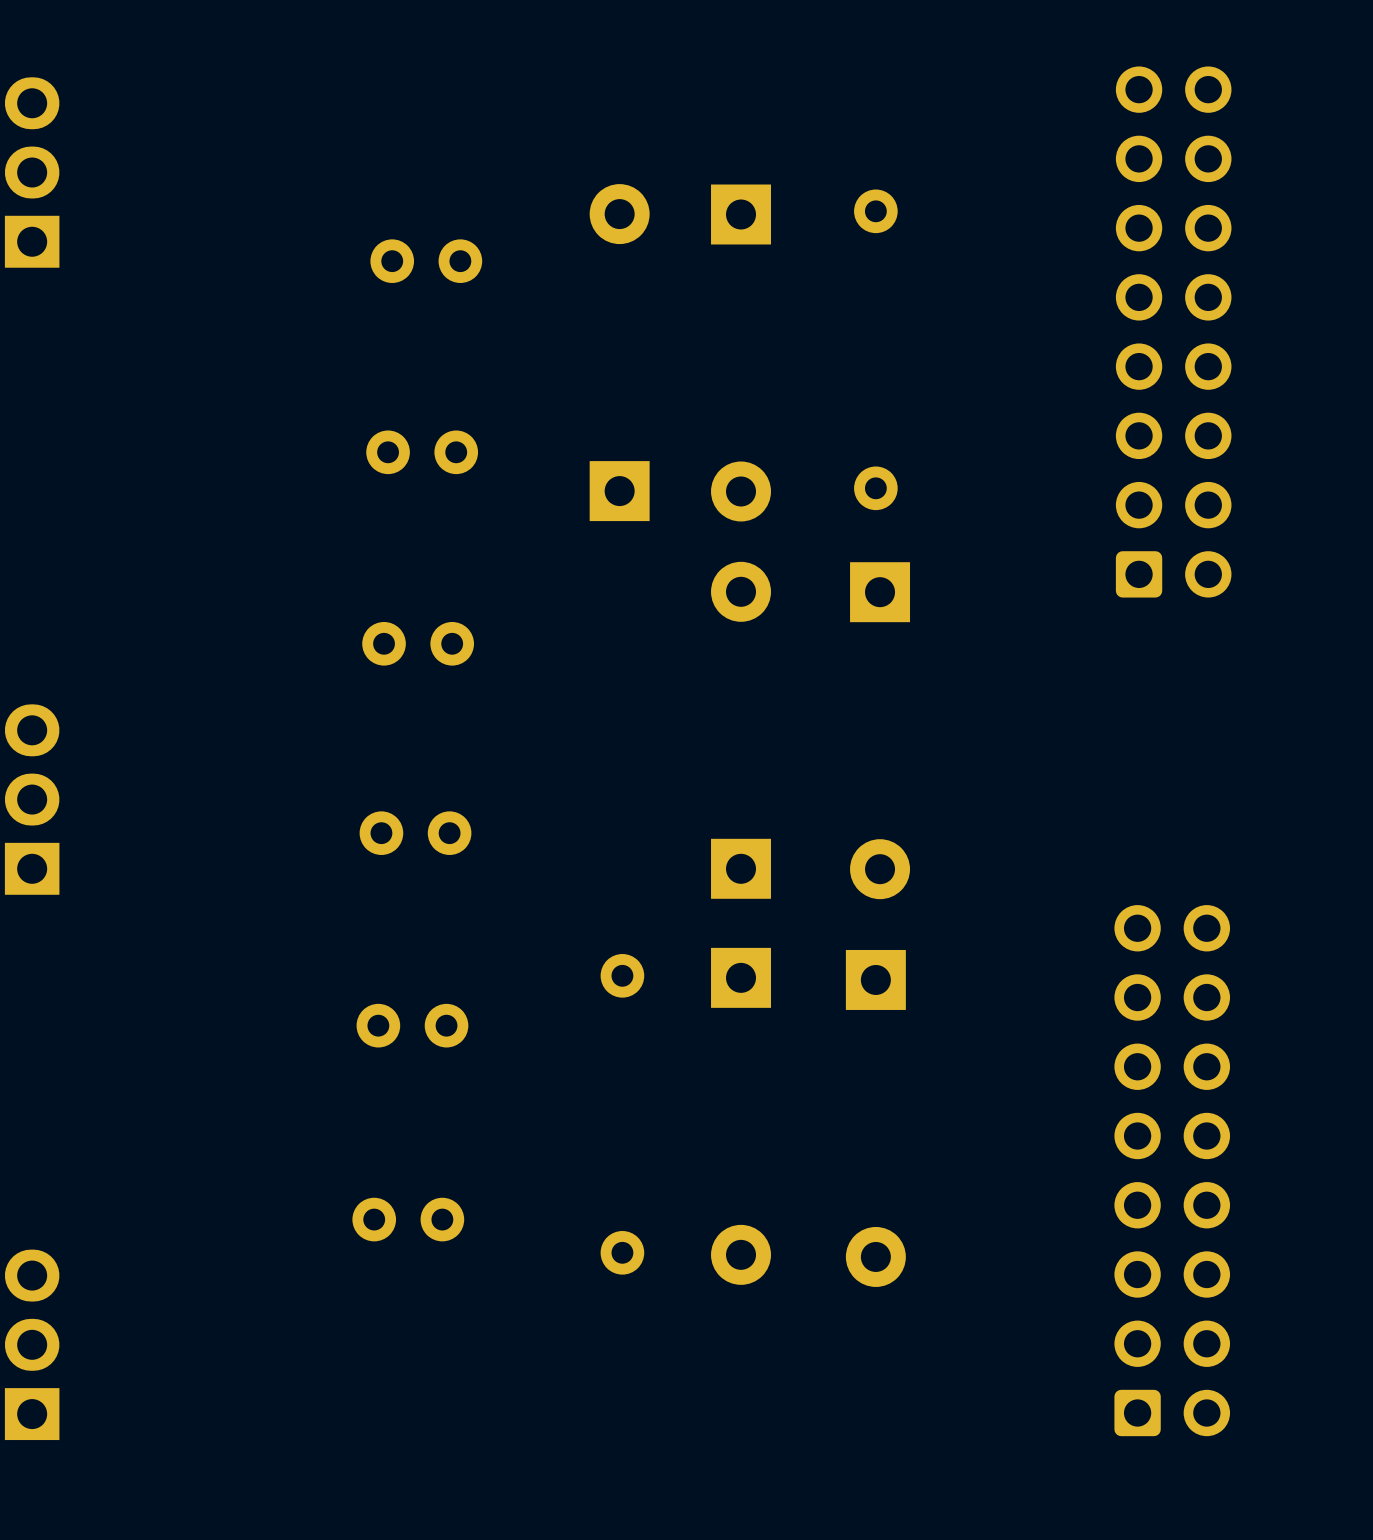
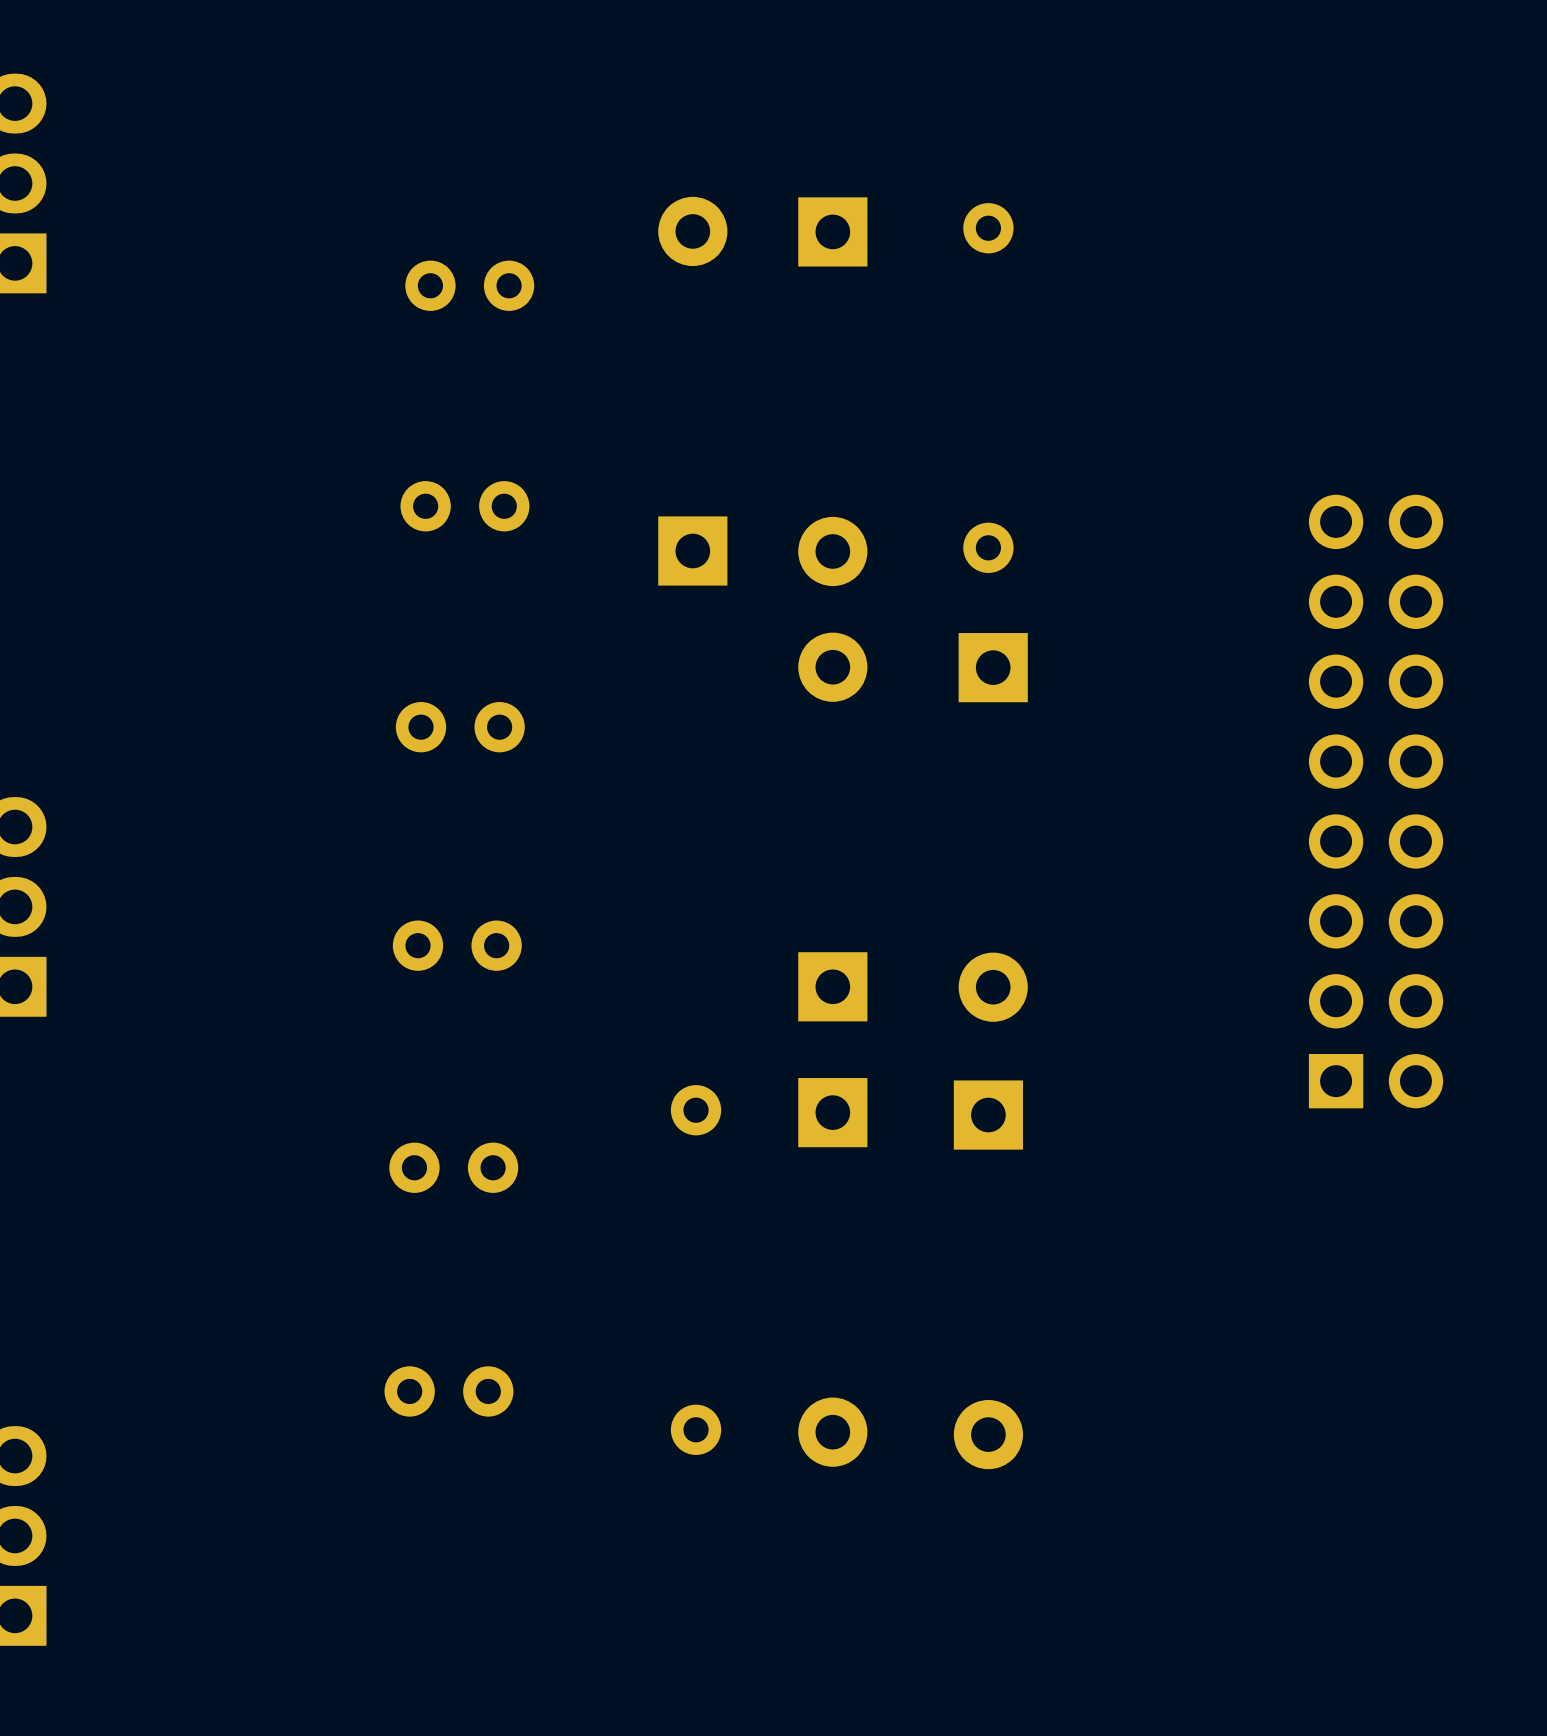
part: (1173, 332) -> none
part: none -> (1376, 801)
part: (1172, 1170) -> none

